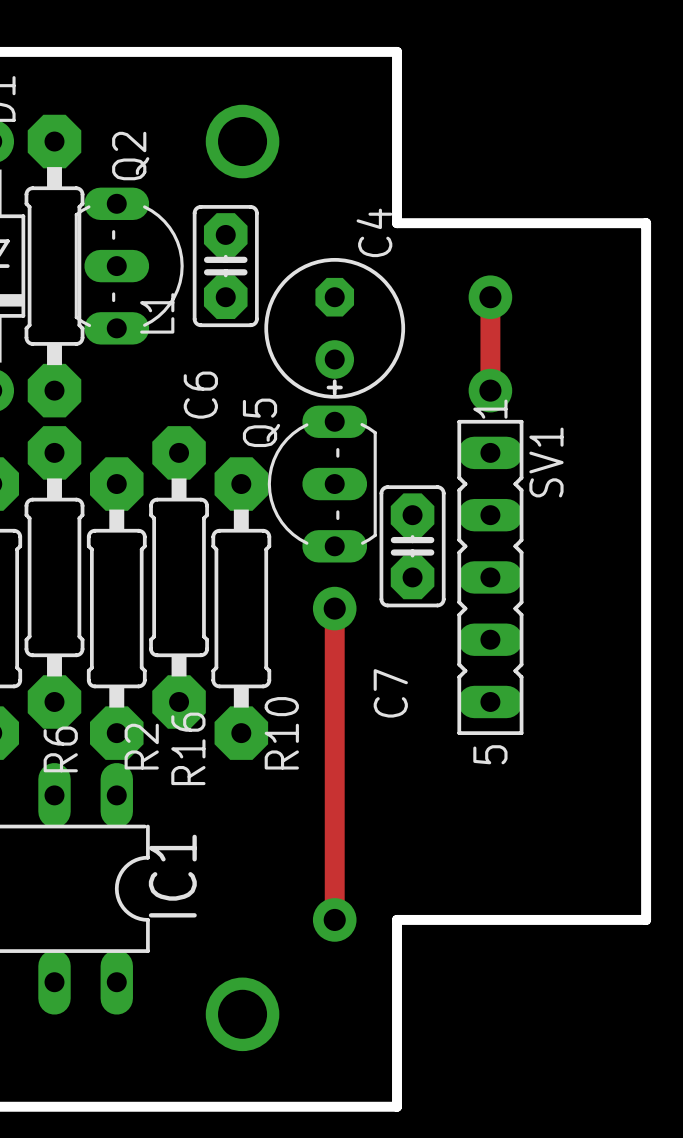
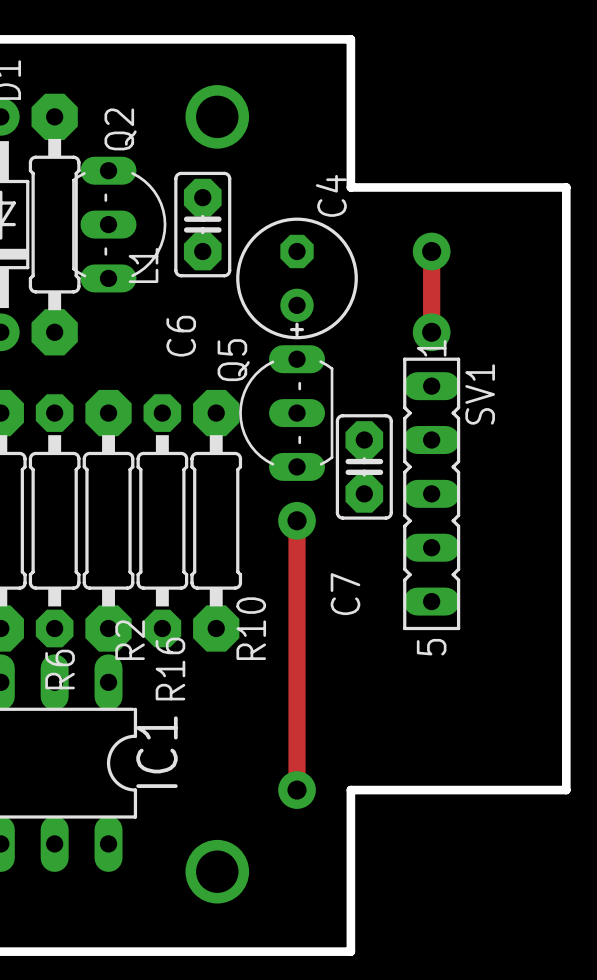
R6 footprint: [24, 426, 85, 729] -> [28, 394, 81, 648]
R16 footprint: [149, 426, 209, 729] -> [136, 394, 189, 648]

